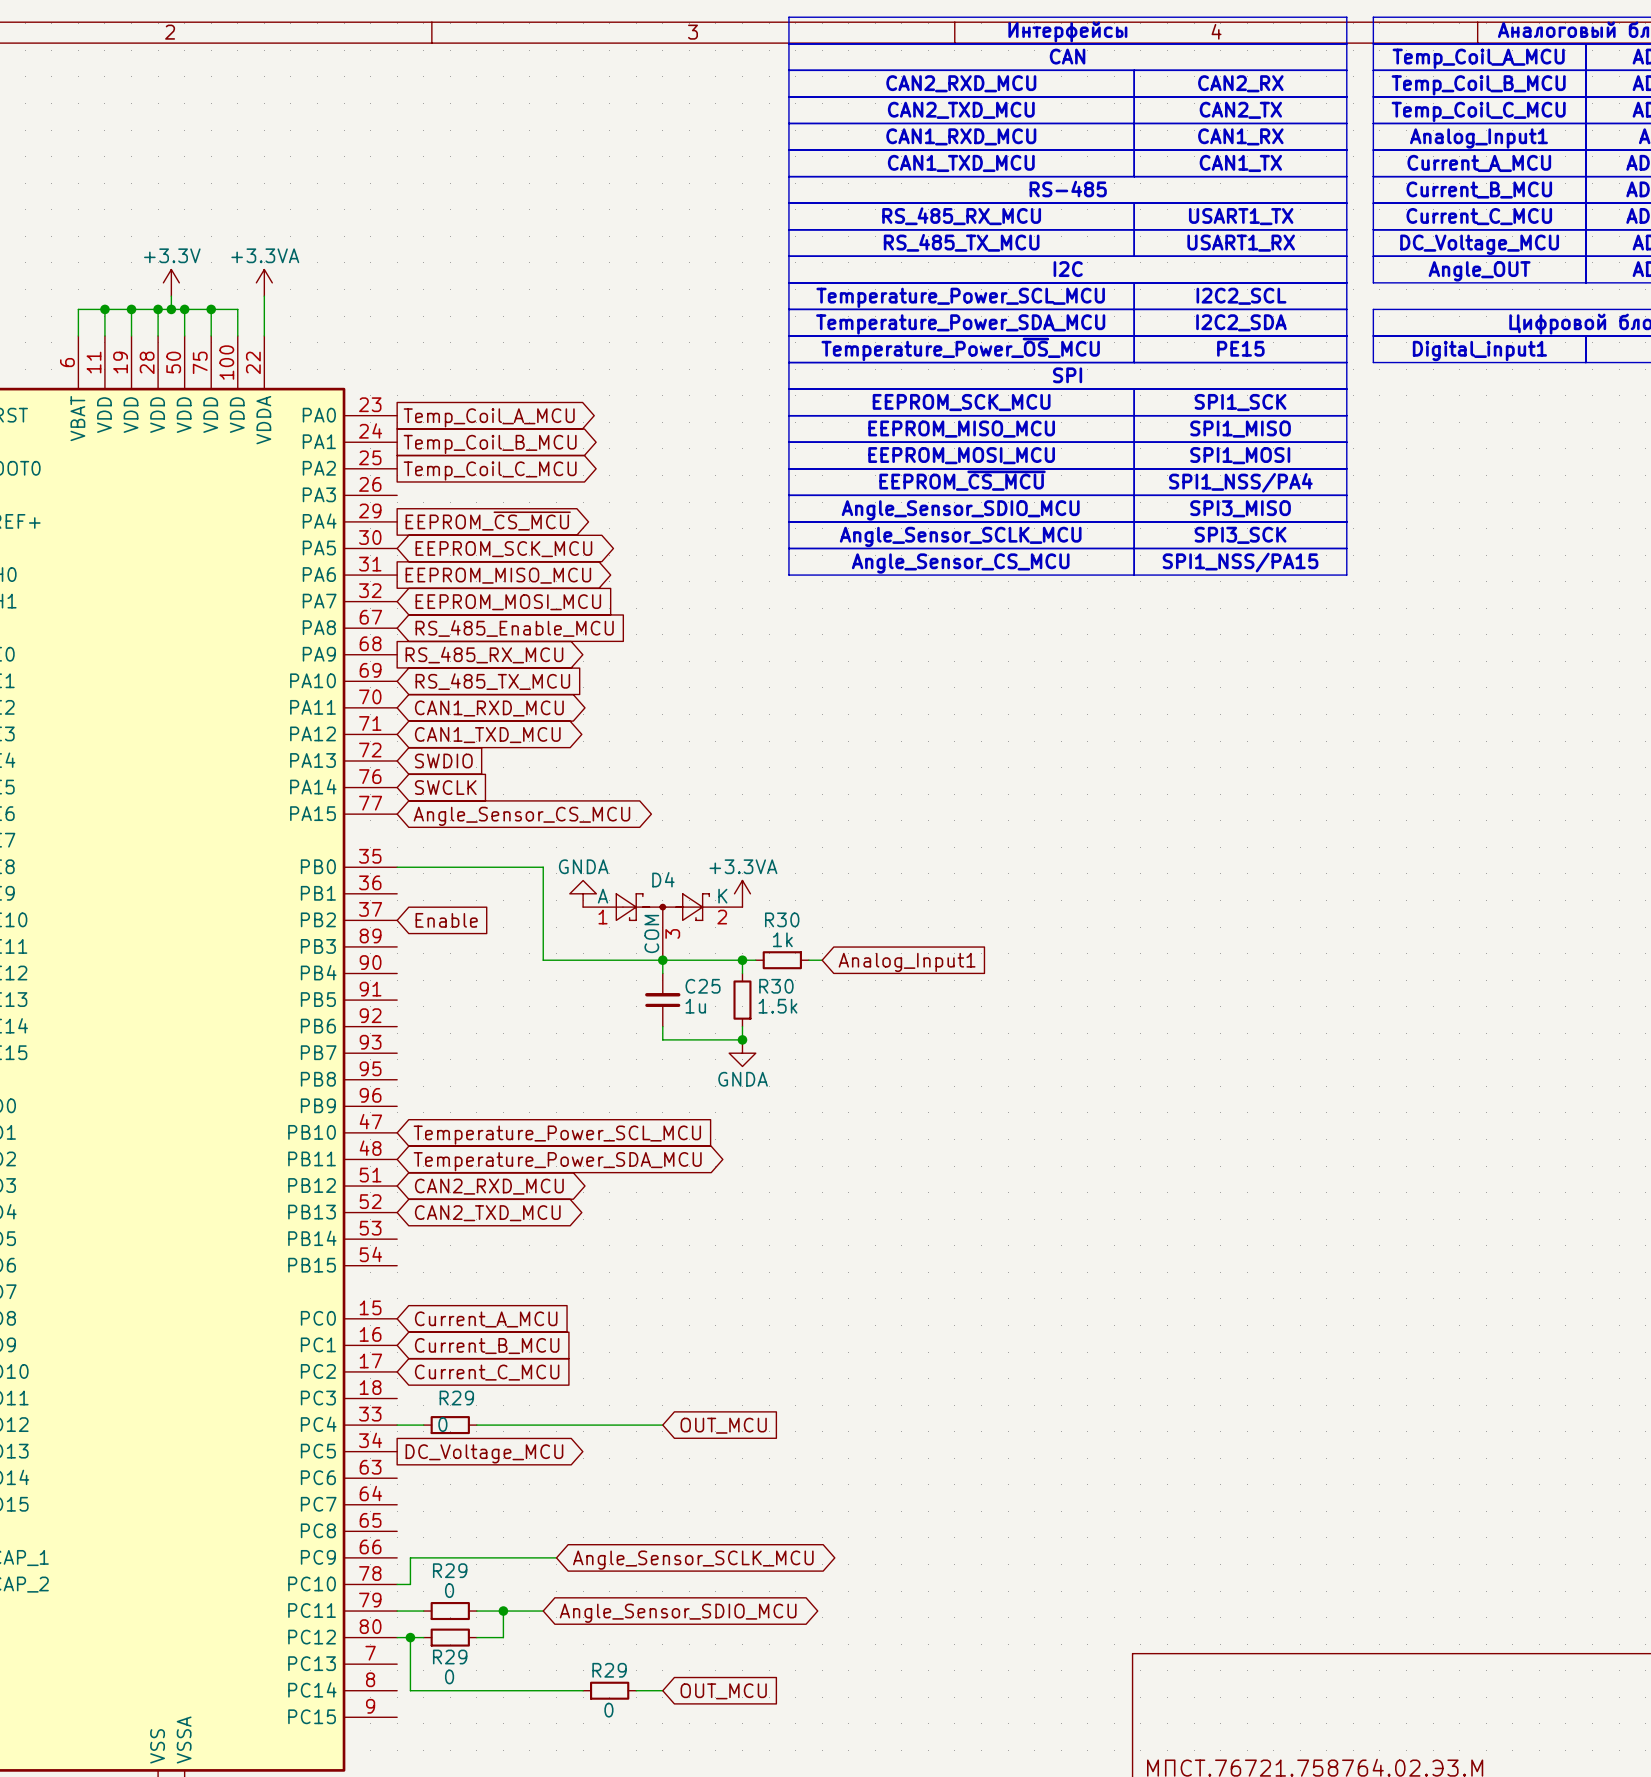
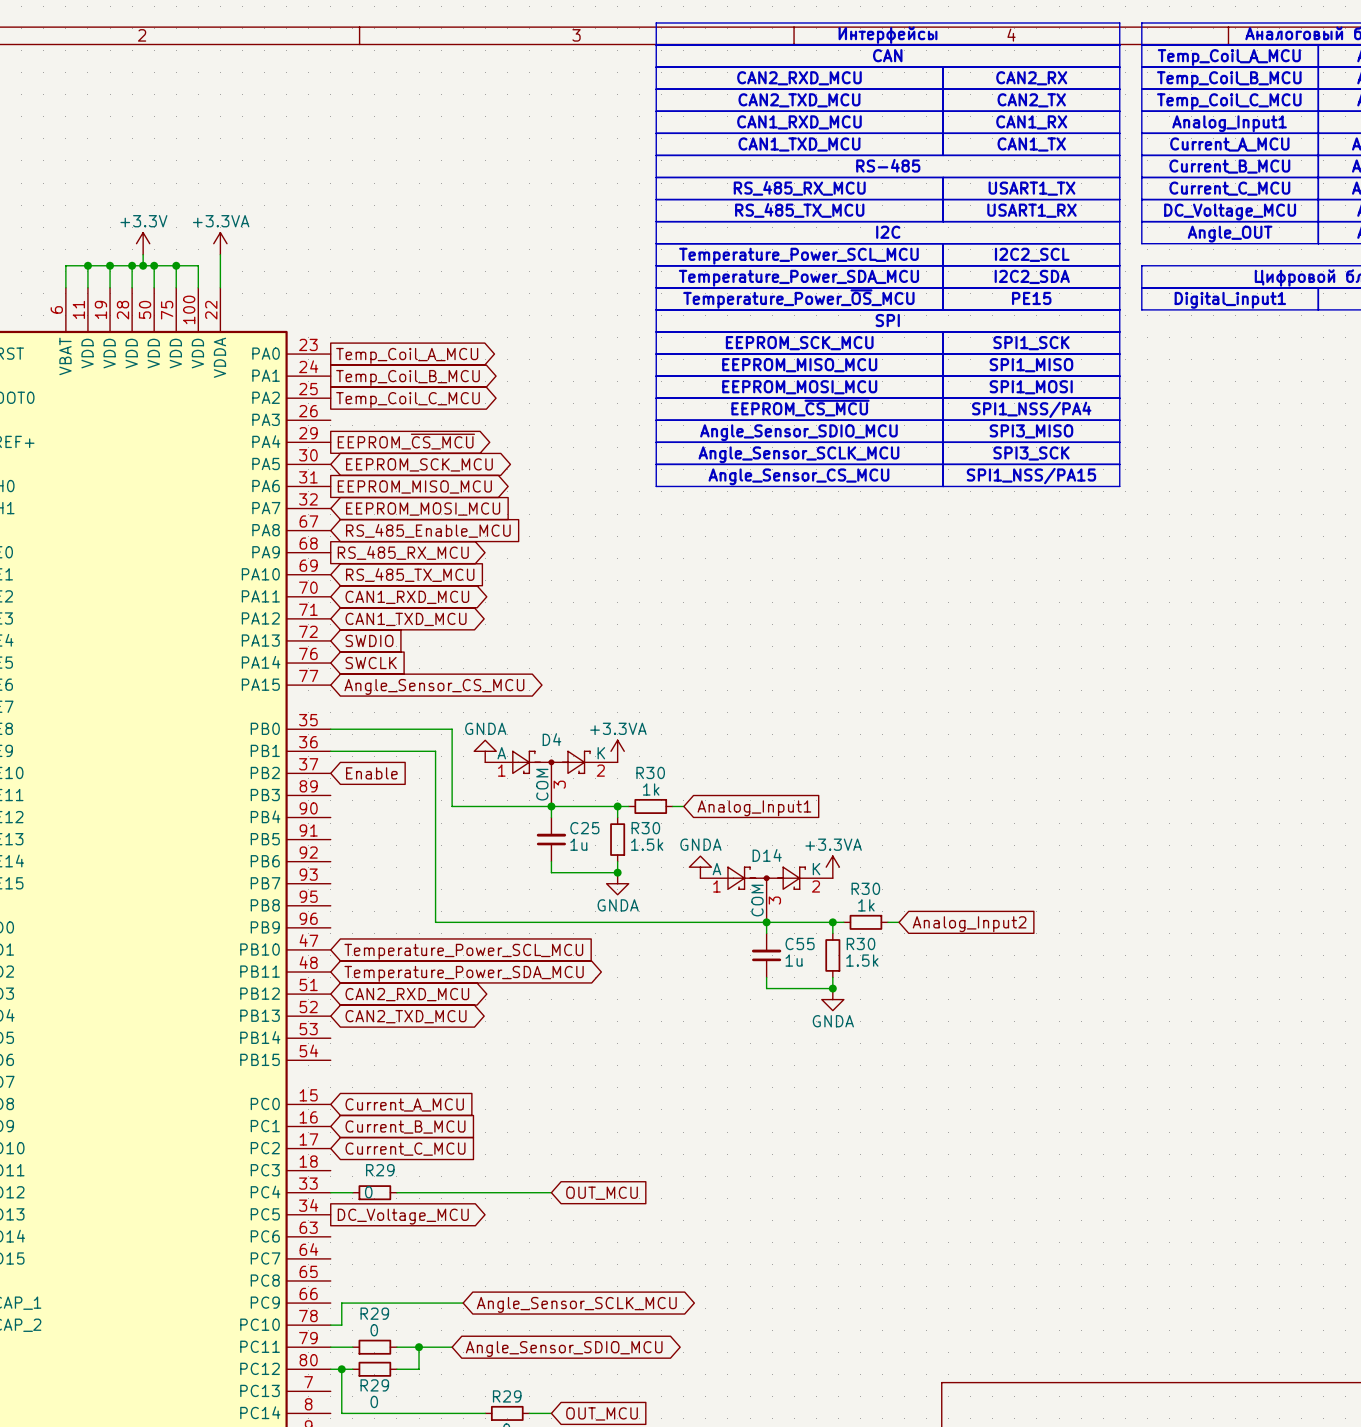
wire: none -> (330, 751) (435, 751) (435, 922) (843, 922)
power symbol: none -> GNDA (700, 867)
power symbol: none -> +3.3VA (832, 867)
D14: none -> (766, 894)
wire: none -> (766, 922) (766, 933)
junction: none -> (766, 922)
wire: none -> (832, 922) (832, 933)
junction: none -> (832, 922)
R30: none -> 1k (865, 922)
wire: none -> (888, 922) (899, 922)
global label: none -> Analog_Input2 (969, 924)
C55: none -> 1u (766, 955)
R30: none -> 1.5k (832, 955)
wire: none -> (766, 977) (766, 988) (832, 988) (832, 977)
junction: none -> (832, 988)
power symbol: none -> GNDA (832, 999)

